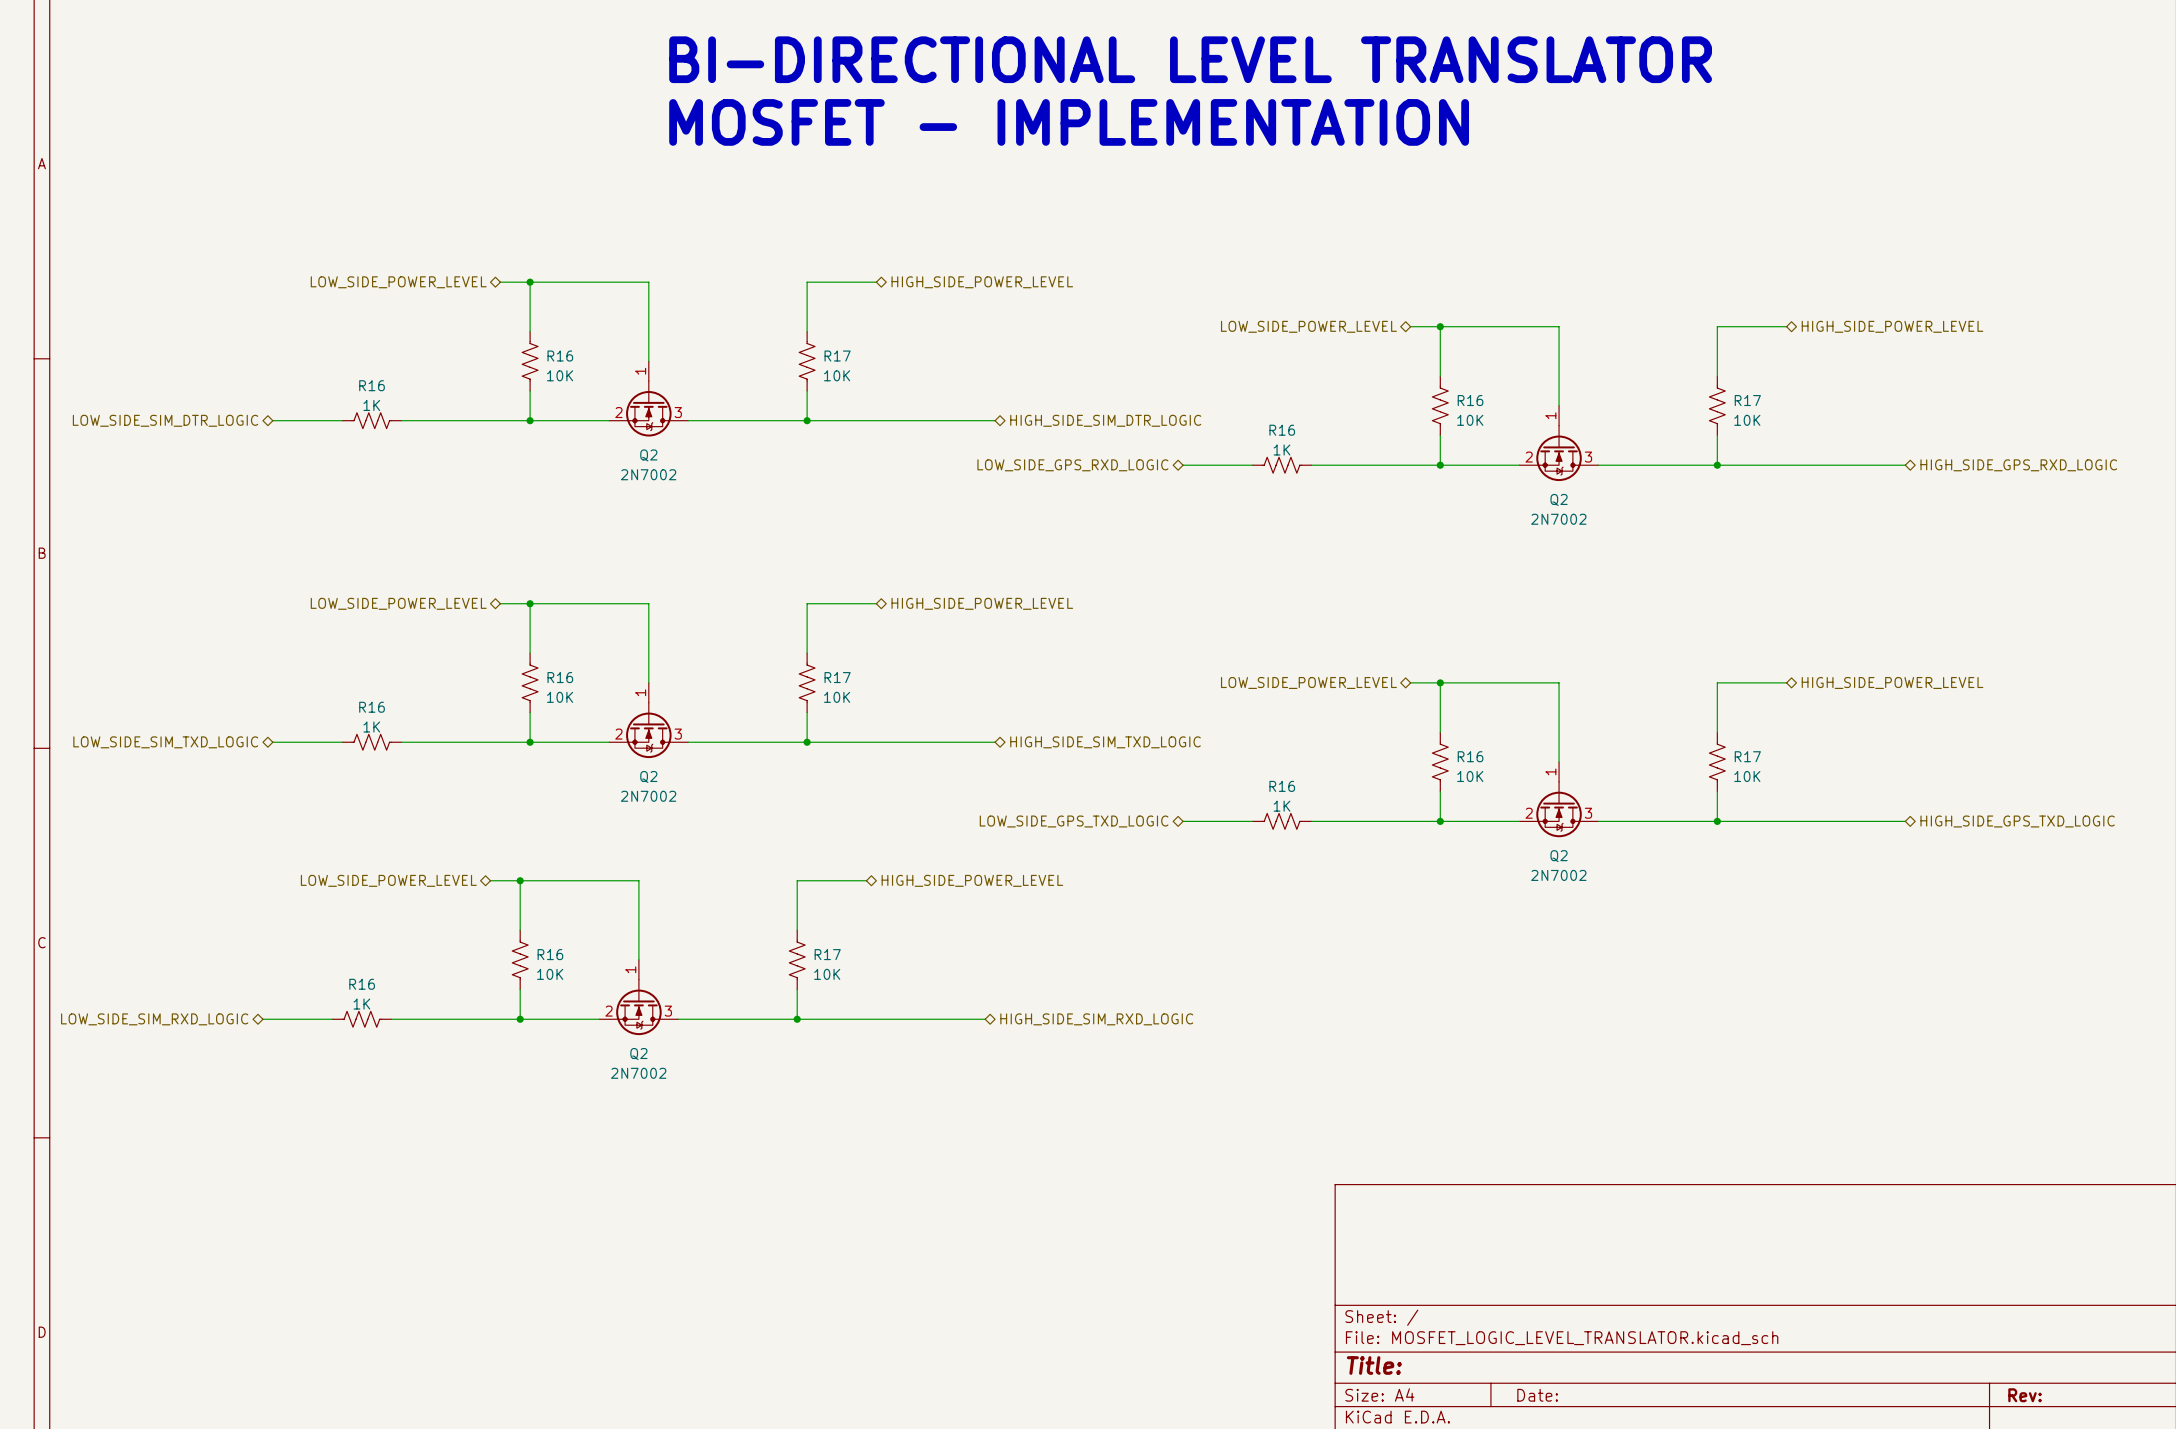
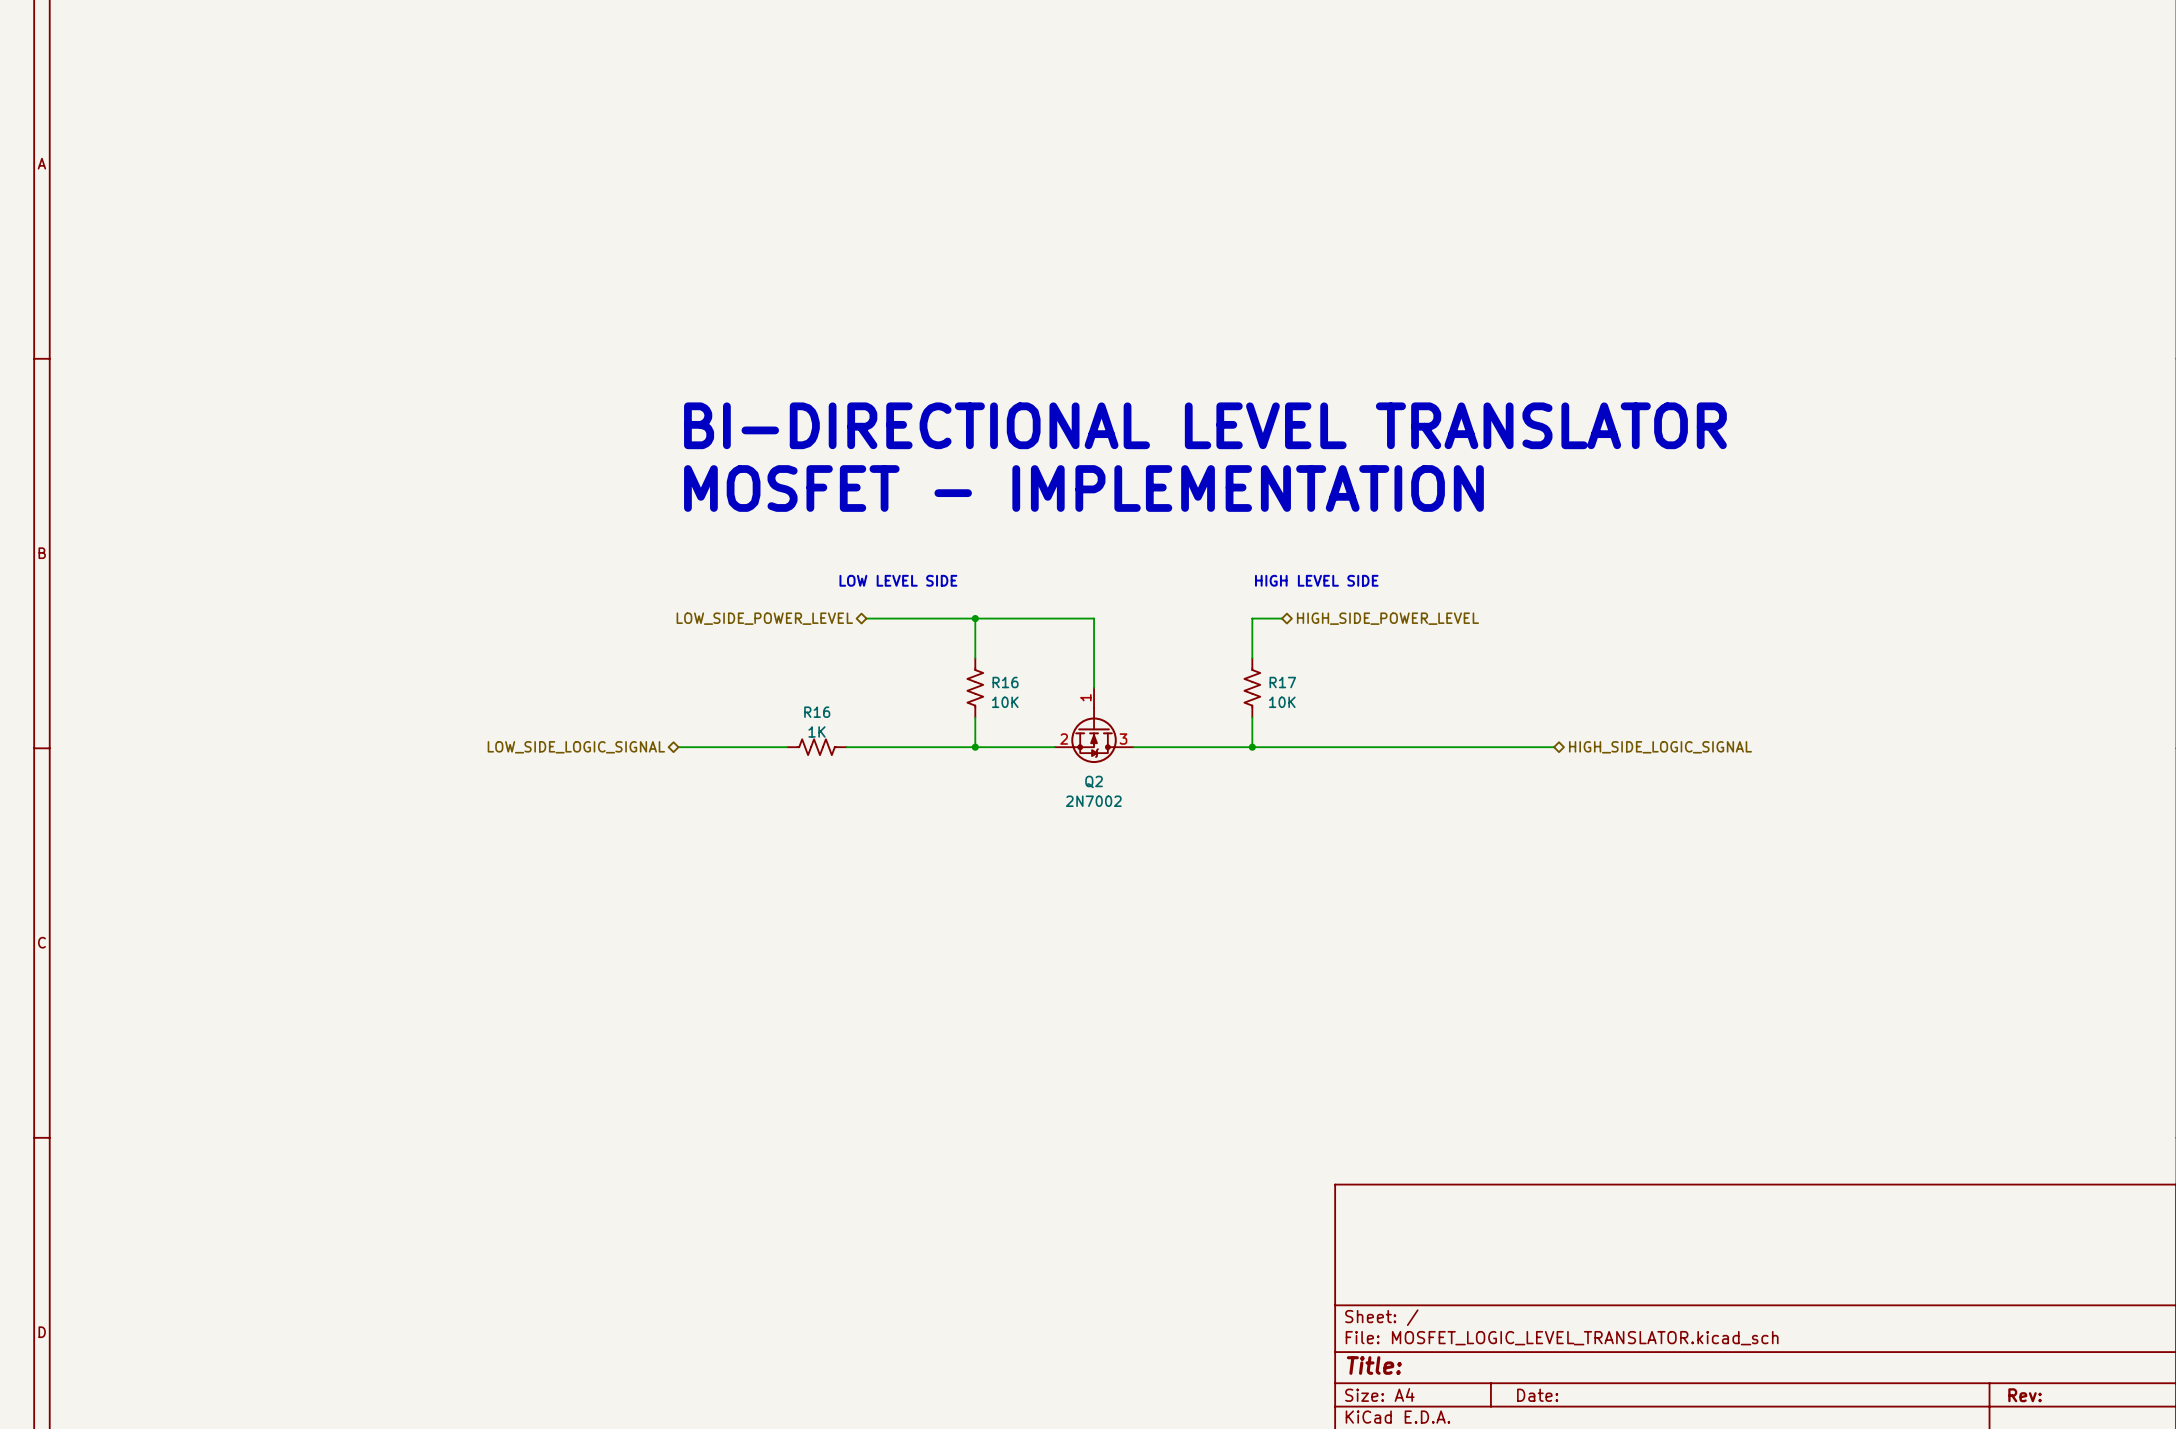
text: BI-DIRECTIONAL LEVEL TRANSLATOR (1190, 59) -> none
text: MOSFET - IMPLEMENTATION (1069, 122) -> none
hierarchical label: LOW_SIDE_POWER_LEVEL (398, 282) -> none
wire: (500, 282) (648, 282) (648, 361) -> none
wire: (530, 282) (530, 331) -> none
junction: (530, 282) -> none
wire: (876, 282) (807, 282) (807, 331) -> none
hierarchical label: HIGH_SIDE_POWER_LEVEL (982, 282) -> none
hierarchical label: LOW_SIDE_POWER_LEVEL (1308, 326) -> none
wire: (1410, 326) (1559, 326) (1559, 405) -> none
wire: (1440, 326) (1440, 376) -> none
junction: (1440, 326) -> none
wire: (1786, 326) (1717, 326) (1717, 376) -> none
hierarchical label: HIGH_SIDE_POWER_LEVEL (1892, 326) -> none
R16: 10K (530, 361) -> none
R17: 10K (807, 361) -> none
wire: (530, 391) (530, 420) -> none
wire: (807, 391) (807, 420) -> none
Q2: 2N7002 (648, 398) -> none
R16: 10K (1440, 405) -> none
R17: 10K (1717, 405) -> none
hierarchical label: LOW_SIDE_SIM_DTR_LOGIC (165, 420) -> none
wire: (272, 420) (342, 420) -> none
R16: 1K (371, 420) -> none
wire: (401, 420) (609, 420) -> none
junction: (530, 420) -> none
wire: (688, 420) (995, 420) -> none
junction: (807, 420) -> none
hierarchical label: HIGH_SIDE_SIM_DTR_LOGIC (1105, 420) -> none
text: none -> BI-DIRECTIONAL LEVEL TRANSLATOR (1205, 425)
wire: (1440, 435) (1440, 465) -> none
wire: (1717, 435) (1717, 465) -> none
Q2: 2N7002 (1559, 443) -> none
hierarchical label: LOW_SIDE_GPS_RXD_LOGIC (1072, 465) -> none
wire: (1183, 465) (1252, 465) -> none
R16: 1K (1282, 465) -> none
wire: (1311, 465) (1519, 465) -> none
junction: (1440, 465) -> none
wire: (1598, 465) (1905, 465) -> none
junction: (1717, 465) -> none
hierarchical label: HIGH_SIDE_GPS_RXD_LOGIC (2018, 465) -> none
text: none -> MOSFET - IMPLEMENTATION (1083, 488)
text: none -> LOW LEVEL SIDE (898, 580)
text: none -> HIGH LEVEL SIDE (1316, 580)
hierarchical label: LOW_SIDE_POWER_LEVEL (398, 603) -> none
wire: (500, 603) (648, 603) (648, 682) -> none
wire: (530, 603) (530, 653) -> none
junction: (530, 603) -> none
wire: (876, 603) (807, 603) (807, 653) -> none
hierarchical label: HIGH_SIDE_POWER_LEVEL (982, 603) -> none
hierarchical label: none -> LOW_SIDE_POWER_LEVEL (764, 618)
wire: none -> (866, 618) (1094, 618) (1094, 687)
wire: none -> (975, 618) (975, 658)
junction: none -> (975, 618)
wire: none -> (1282, 618) (1252, 618) (1252, 658)
hierarchical label: none -> HIGH_SIDE_POWER_LEVEL (1387, 618)
R16: 10K (530, 682) -> none
R17: 10K (807, 682) -> none
hierarchical label: LOW_SIDE_POWER_LEVEL (1308, 682) -> none
wire: (1410, 682) (1559, 682) (1559, 762) -> none
wire: (1440, 682) (1440, 732) -> none
junction: (1440, 682) -> none
wire: (1786, 682) (1717, 682) (1717, 732) -> none
hierarchical label: HIGH_SIDE_POWER_LEVEL (1892, 682) -> none
R16: none -> 10K (975, 687)
R17: none -> 10K (1252, 687)
wire: (530, 712) (530, 742) -> none
wire: (807, 712) (807, 742) -> (975, 717) (975, 747)
wire: none -> (1252, 717) (1252, 747)
Q2: 2N7002 (648, 720) -> none
Q2: none -> 2N7002 (1094, 725)
hierarchical label: LOW_SIDE_SIM_TXD_LOGIC (165, 742) -> none
wire: (272, 742) (342, 742) -> none
R16: 1K (371, 742) -> none
wire: (401, 742) (609, 742) -> none
junction: (530, 742) -> none
wire: (688, 742) (995, 742) -> none
junction: (807, 742) -> none
hierarchical label: HIGH_SIDE_SIM_TXD_LOGIC (1105, 742) -> none
hierarchical label: none -> LOW_SIDE_LOGIC_SIGNAL (576, 747)
wire: none -> (678, 747) (787, 747)
R16: none -> 1K (817, 747)
wire: none -> (846, 747) (1054, 747)
junction: none -> (975, 747)
wire: none -> (1133, 747) (1554, 747)
junction: none -> (1252, 747)
hierarchical label: none -> HIGH_SIDE_LOGIC_SIGNAL (1660, 747)
R16: 10K (1440, 762) -> none
R17: 10K (1717, 762) -> none
wire: (1440, 791) (1440, 821) -> none
wire: (1717, 791) (1717, 821) -> none
Q2: 2N7002 (1559, 799) -> none
hierarchical label: LOW_SIDE_GPS_TXD_LOGIC (1074, 821) -> none
wire: (1183, 821) (1252, 821) -> none
R16: 1K (1282, 821) -> none
wire: (1311, 821) (1519, 821) -> none
junction: (1440, 821) -> none
wire: (1598, 821) (1905, 821) -> none
junction: (1717, 821) -> none
hierarchical label: HIGH_SIDE_GPS_TXD_LOGIC (2017, 821) -> none
hierarchical label: LOW_SIDE_POWER_LEVEL (388, 880) -> none
wire: (490, 880) (638, 880) (638, 959) -> none
wire: (520, 880) (520, 930) -> none
junction: (520, 880) -> none
wire: (866, 880) (797, 880) (797, 930) -> none
hierarchical label: HIGH_SIDE_POWER_LEVEL (972, 880) -> none
R16: 10K (520, 959) -> none
R17: 10K (797, 959) -> none
wire: (520, 989) (520, 1019) -> none
wire: (797, 989) (797, 1019) -> none
Q2: 2N7002 (638, 997) -> none
hierarchical label: LOW_SIDE_SIM_RXD_LOGIC (154, 1019) -> none
wire: (262, 1019) (332, 1019) -> none
R16: 1K (361, 1019) -> none
wire: (391, 1019) (599, 1019) -> none
junction: (520, 1019) -> none
wire: (678, 1019) (985, 1019) -> none
junction: (797, 1019) -> none
hierarchical label: HIGH_SIDE_SIM_RXD_LOGIC (1096, 1019) -> none

